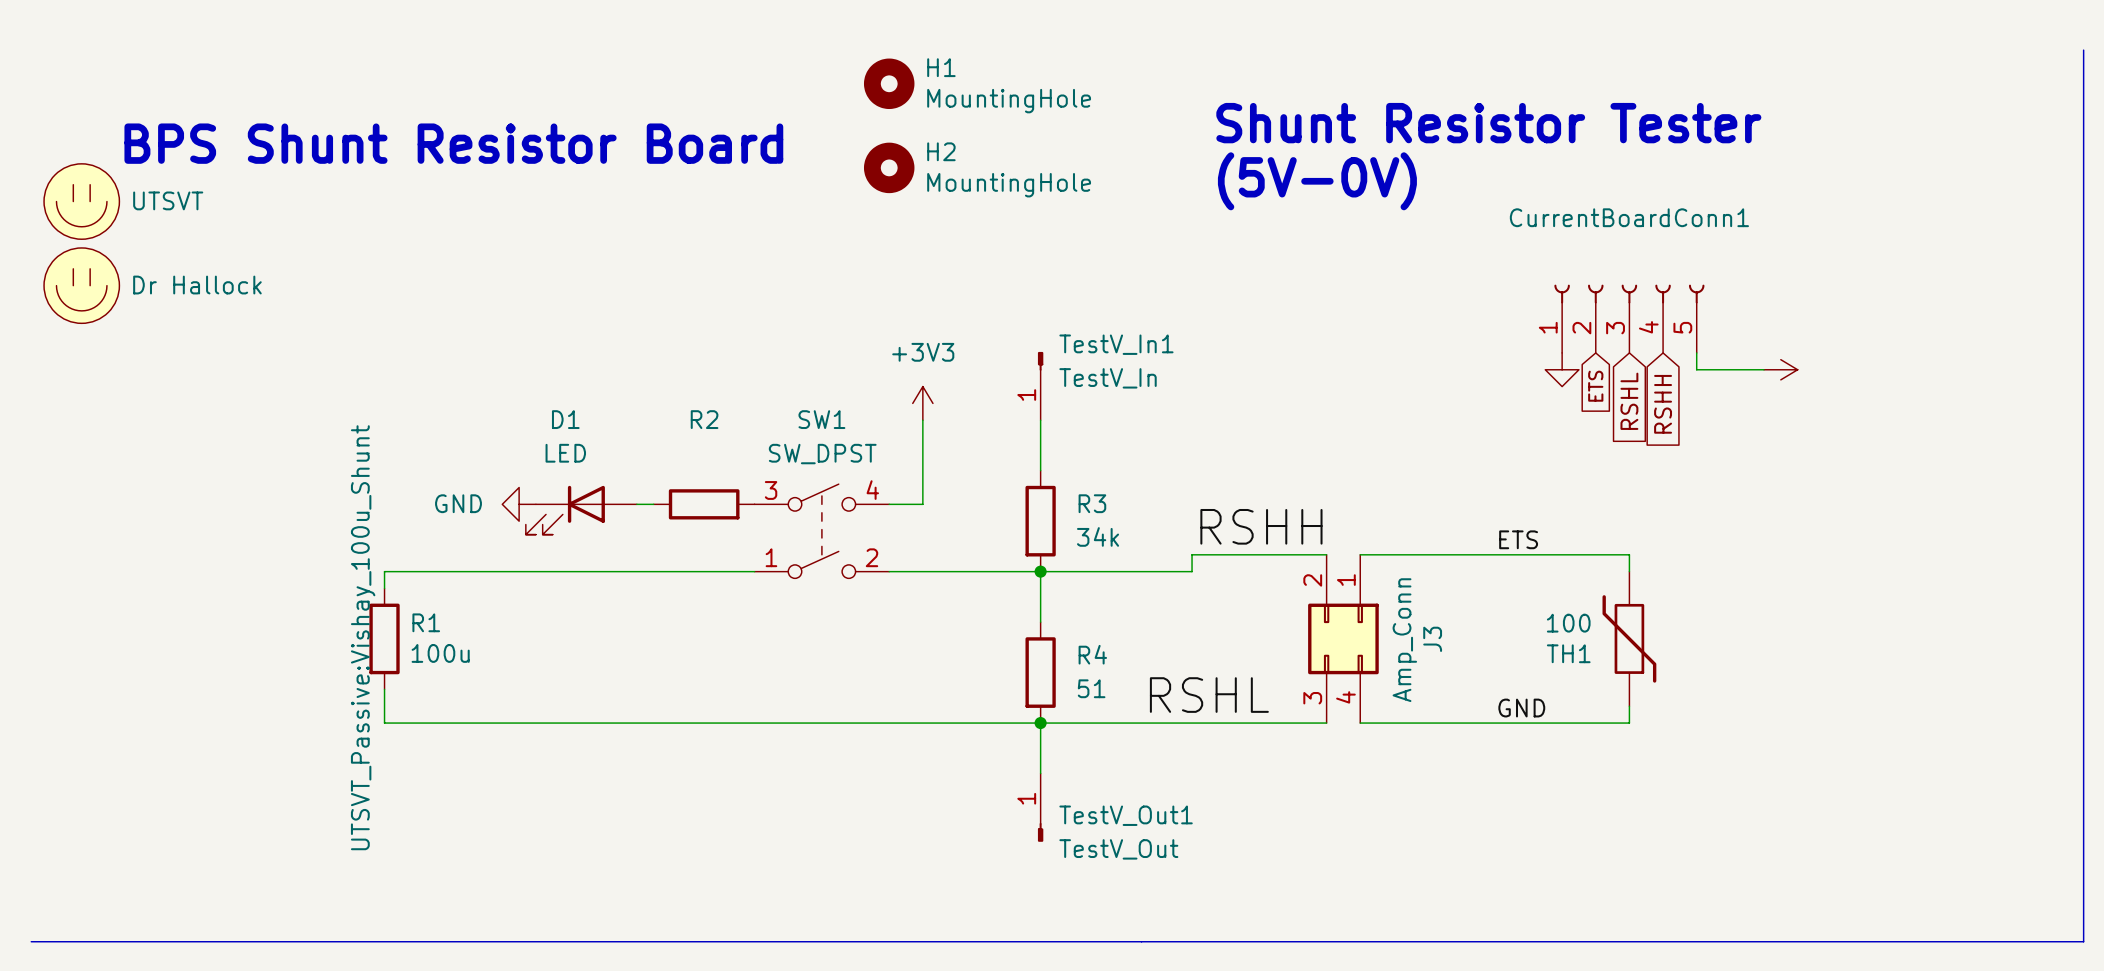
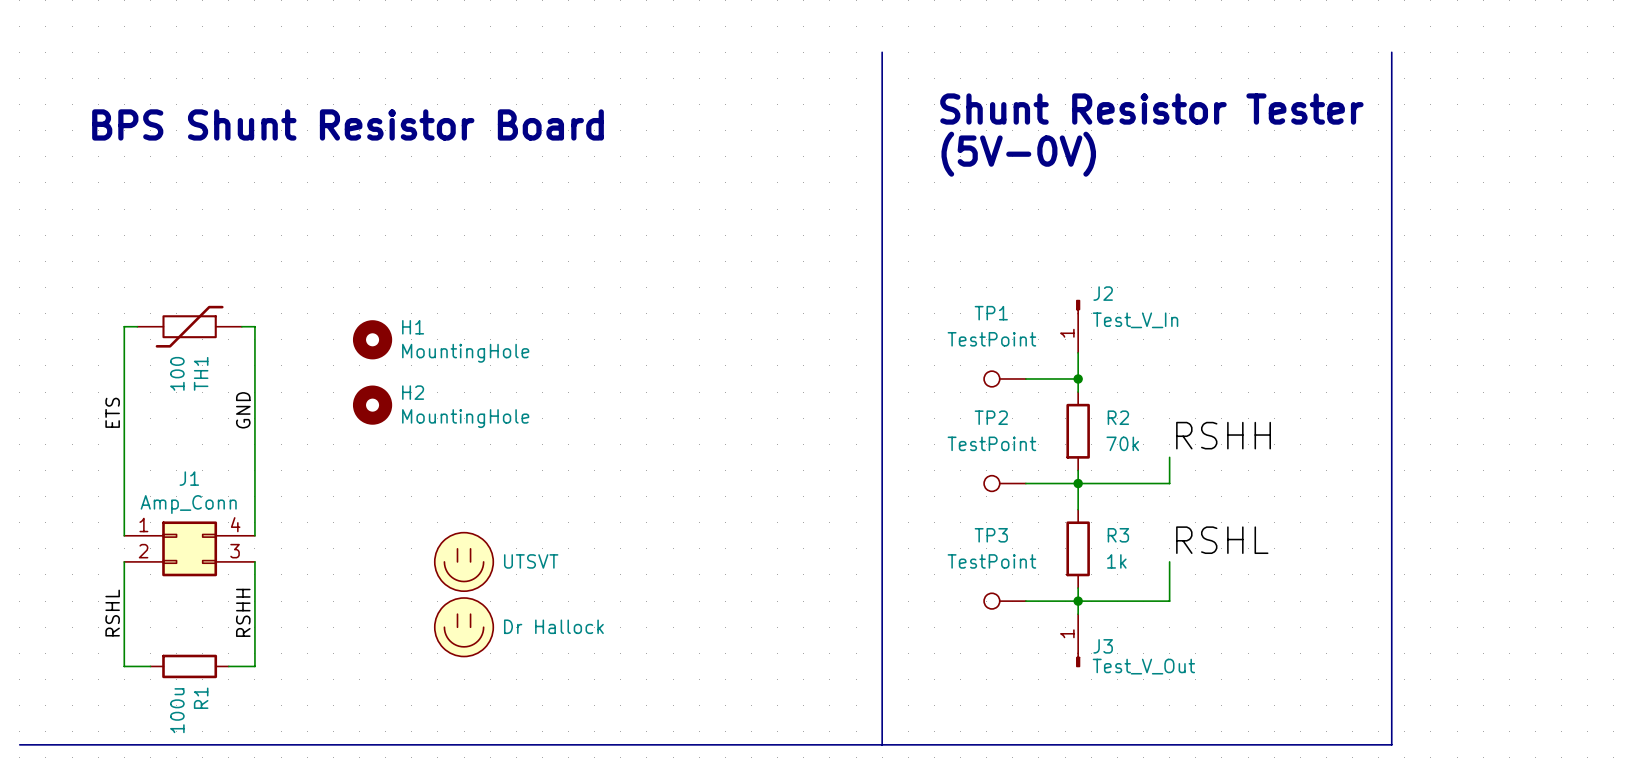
line: none -> (882, 52) (882, 744)
line: (2083, 50) (2083, 941) (1797, 941) -> (1391, 52) (1391, 744)
H1 position: (889, 83) -> (372, 339)
H2 position: (889, 167) -> (372, 405)
part: UTSVT (81, 201) -> none
part: Dr Hallock (81, 285) -> none
CurrentBoardConn1: (1629, 318) -> none
wire: (1696, 352) (1696, 369) (1764, 369) -> none
power symbol: (1562, 369) -> none
power symbol: (1780, 369) -> none
TestV_In1: TestV_In (1040, 386) -> none
global label: ETS (1595, 386) -> none
global label: RSHL (1629, 401) -> none
J2: none -> Test_V_In (1078, 326)
wire: none -> (137, 326) (124, 326) (124, 535)
wire: none -> (241, 326) (254, 326) (254, 535)
power symbol: +3V3 (922, 403) -> none
global label: RSHH (1663, 404) -> none
R2 name position: R2 (704, 419) -> R2 (1118, 417)
wire: (922, 420) (922, 504) (889, 504) -> none
wire: (1040, 420) (1040, 470) -> none
wire: none -> (1078, 352) (1078, 392)
TP1: none -> TestPoint (1004, 378)
wire: none -> (1025, 378) (1078, 378)
junction: none -> (1078, 378)
power symbol: GND (519, 504) -> none
wire: (636, 504) (653, 504) -> none
R2 rotation: 0° (704, 504) -> 90° clockwise (1078, 431)
R2 position: (704, 504) -> (1078, 431)
D1: LED (581, 510) -> none
label: none -> GND (243, 410)
label: none -> ETS (112, 412)
R3 position: (1040, 521) -> (1078, 548)
label position: RSHH (1261, 526) -> RSHH (1223, 435)
SW1: SW_DPST (821, 531) -> none
R3 value: 34k (1098, 536) -> 1k (1116, 561)
label: ETS (1518, 539) -> none
J3 symbol: [1308, 554, 1379, 724] -> [1076, 614, 1081, 668]
wire: (1326, 554) (1192, 554) (1192, 571) (889, 571) -> none
wire: (1360, 554) (1629, 554) (1629, 571) -> none
R2 value: none -> 70k (1122, 443)
wire: (754, 571) (384, 571) (384, 588) -> none
wire: (1040, 571) (1040, 622) -> none
junction: (1040, 571) -> none
wire: none -> (1169, 457) (1169, 483) (1025, 483)
wire: none -> (1078, 470) (1078, 509)
TP2: none -> TestPoint (1004, 483)
junction: none -> (1078, 483)
R1 text: UTSVT_Passive:Vishay_100u_Shunt (363, 637) -> none
R1 rotation: 0° (384, 638) -> 90° clockwise (189, 666)
R1 position: (384, 638) -> (189, 666)
TH1 rotation: 0° (1629, 638) -> 90° counterclockwise (189, 326)
TH1 position: (1629, 638) -> (189, 326)
J3 name position: J3 (1432, 639) -> J3 (1103, 646)
J3 value: Amp_Conn (1404, 640) -> Test_V_Out (1143, 666)
R4: 51 (1040, 672) -> none
label: none -> RSHL (1222, 540)
J1: none -> Amp_Conn (189, 548)
wire: (384, 689) (384, 723) (1326, 723) -> none
label: RSHL (1209, 695) -> none
wire: none -> (124, 561) (124, 666) (150, 666)
wire: none -> (254, 561) (254, 666) (228, 666)
part: none -> UTSVT (464, 561)
wire: none -> (1169, 561) (1169, 601) (1025, 601)
wire: (1629, 706) (1629, 723) (1360, 723) -> none
label: GND (1521, 708) -> none
wire: (1040, 723) (1040, 773) -> none
junction: (1040, 723) -> none
wire: none -> (1078, 588) (1078, 614)
TP3: none -> TestPoint (1004, 601)
junction: none -> (1078, 601)
label: none -> RSHH (243, 612)
label: none -> RSHL (112, 613)
part: none -> Dr Hallock (464, 627)
TestV_Out1: TestV_Out (1040, 807) -> none

